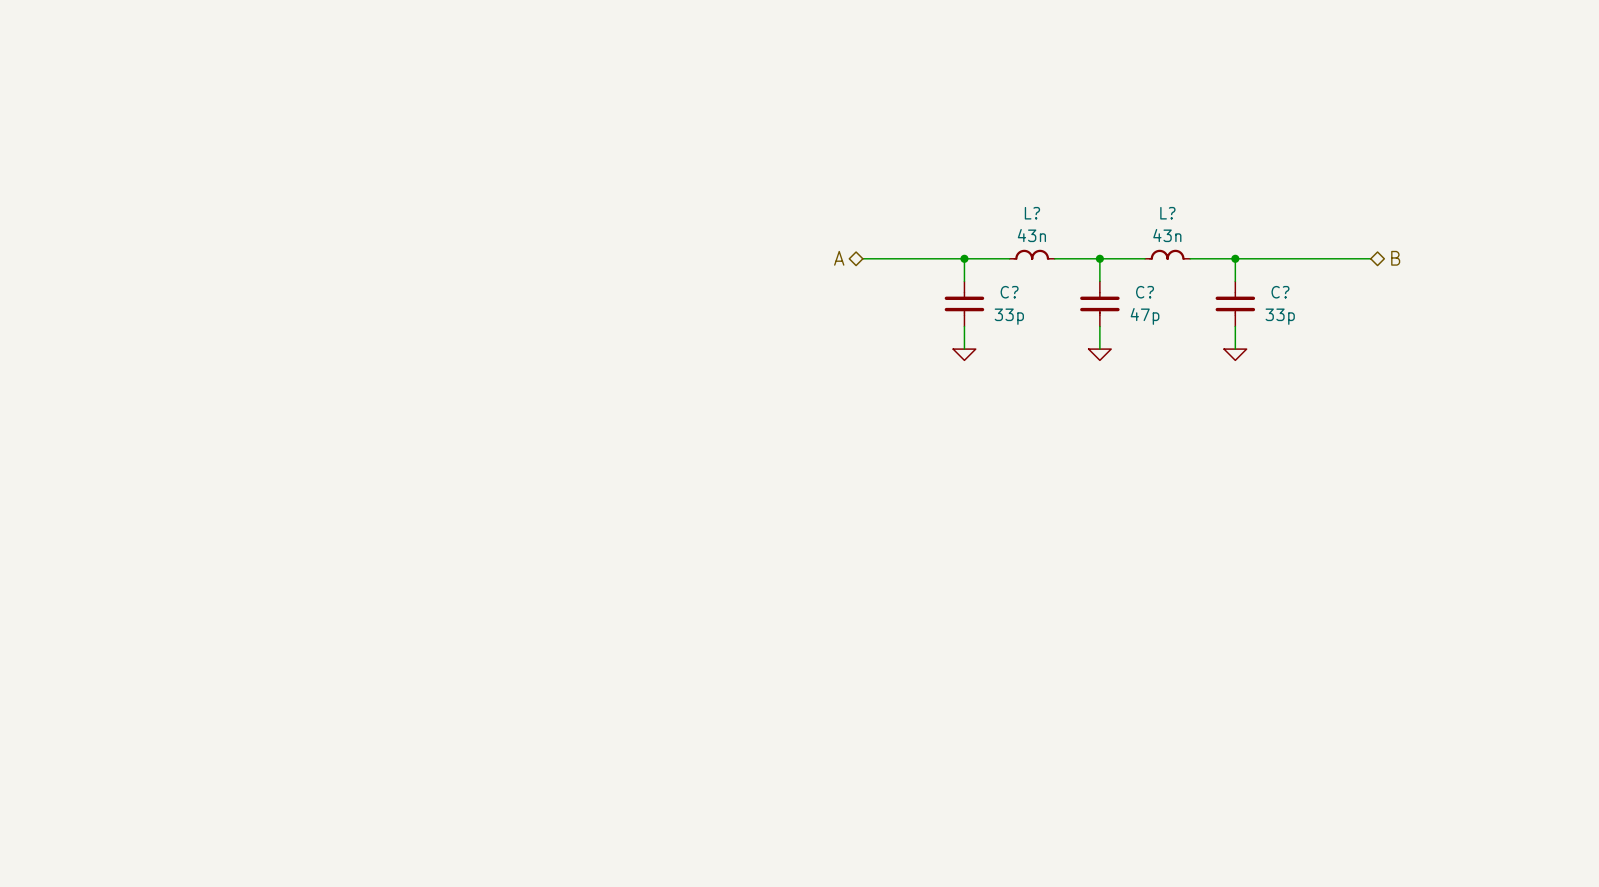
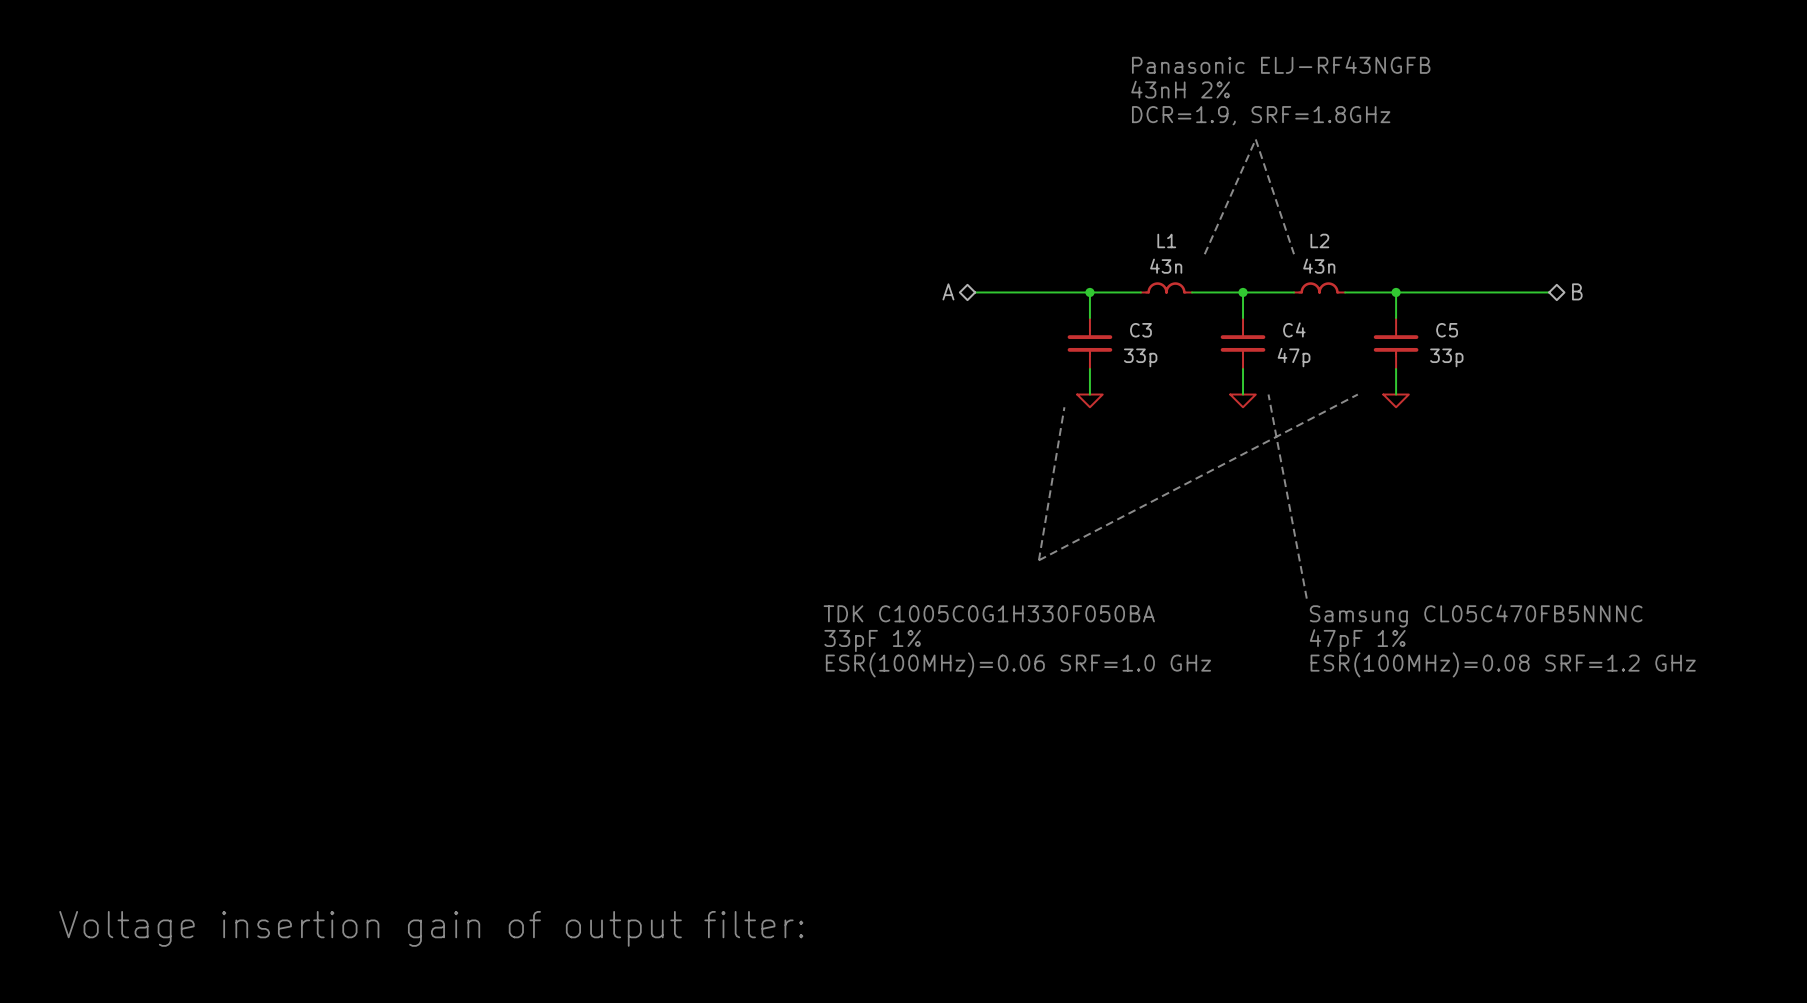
text: none -> Panasonic ELJ-RF43NGFB (1281, 64)
text: none -> 43nH 2% (1180, 89)
text: none -> DCR=1.9, SRF=1.8GHz (1261, 115)
L? name: L? (1032, 213) -> L1 (1166, 240)
L? name: L? (1167, 213) -> L2 (1319, 240)
line: none -> (1204, 254) (1255, 139) (1294, 254)
C? name: C? (1009, 292) -> C3 (1140, 330)
C? name: C? (1145, 292) -> C4 (1294, 329)
C? name: C? (1280, 292) -> C5 (1447, 330)
line: none -> (1268, 394) (1306, 598)
line: none -> (1357, 394) (1038, 560) (1064, 407)
text: none -> TDK C1005C0G1H330F050BA (989, 613)
text: none -> Samsung CL05C470FB5NNNC (1476, 616)
text: none -> 47pF 1% (1357, 640)
text: none -> 33pF 1% (872, 641)
text: none -> ESR(100MHz)=0.06 SRF=1.0 GHz (1018, 664)
text: none -> ESR(100MHz)=0.08 SRF=1.2 GHz (1503, 664)
text: none -> Voltage insertion gain of output filter: (431, 928)

